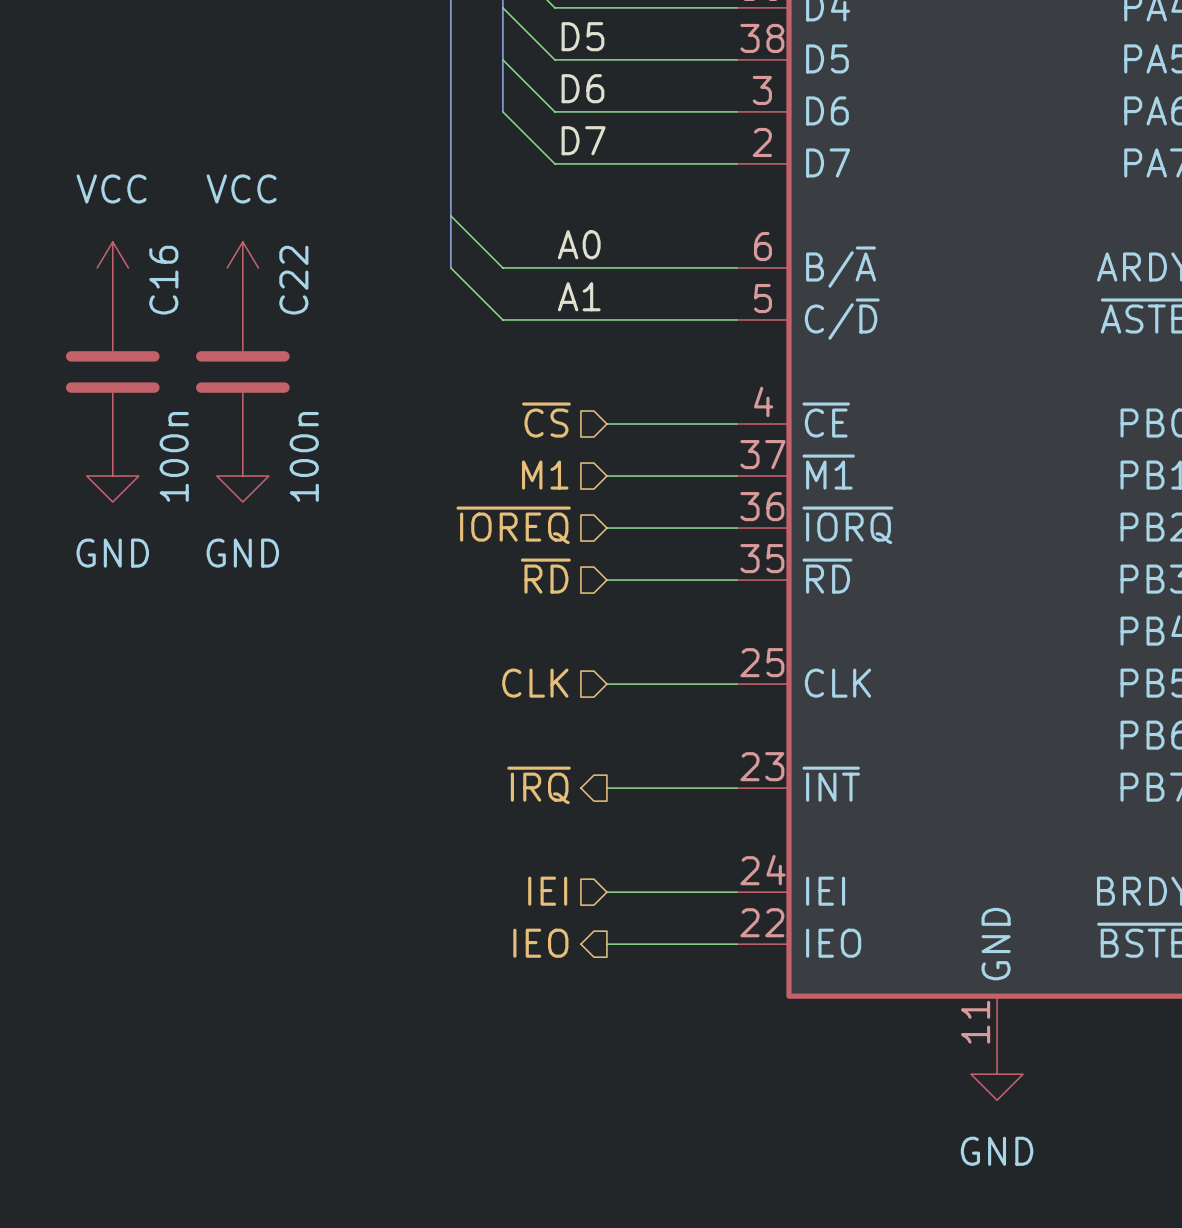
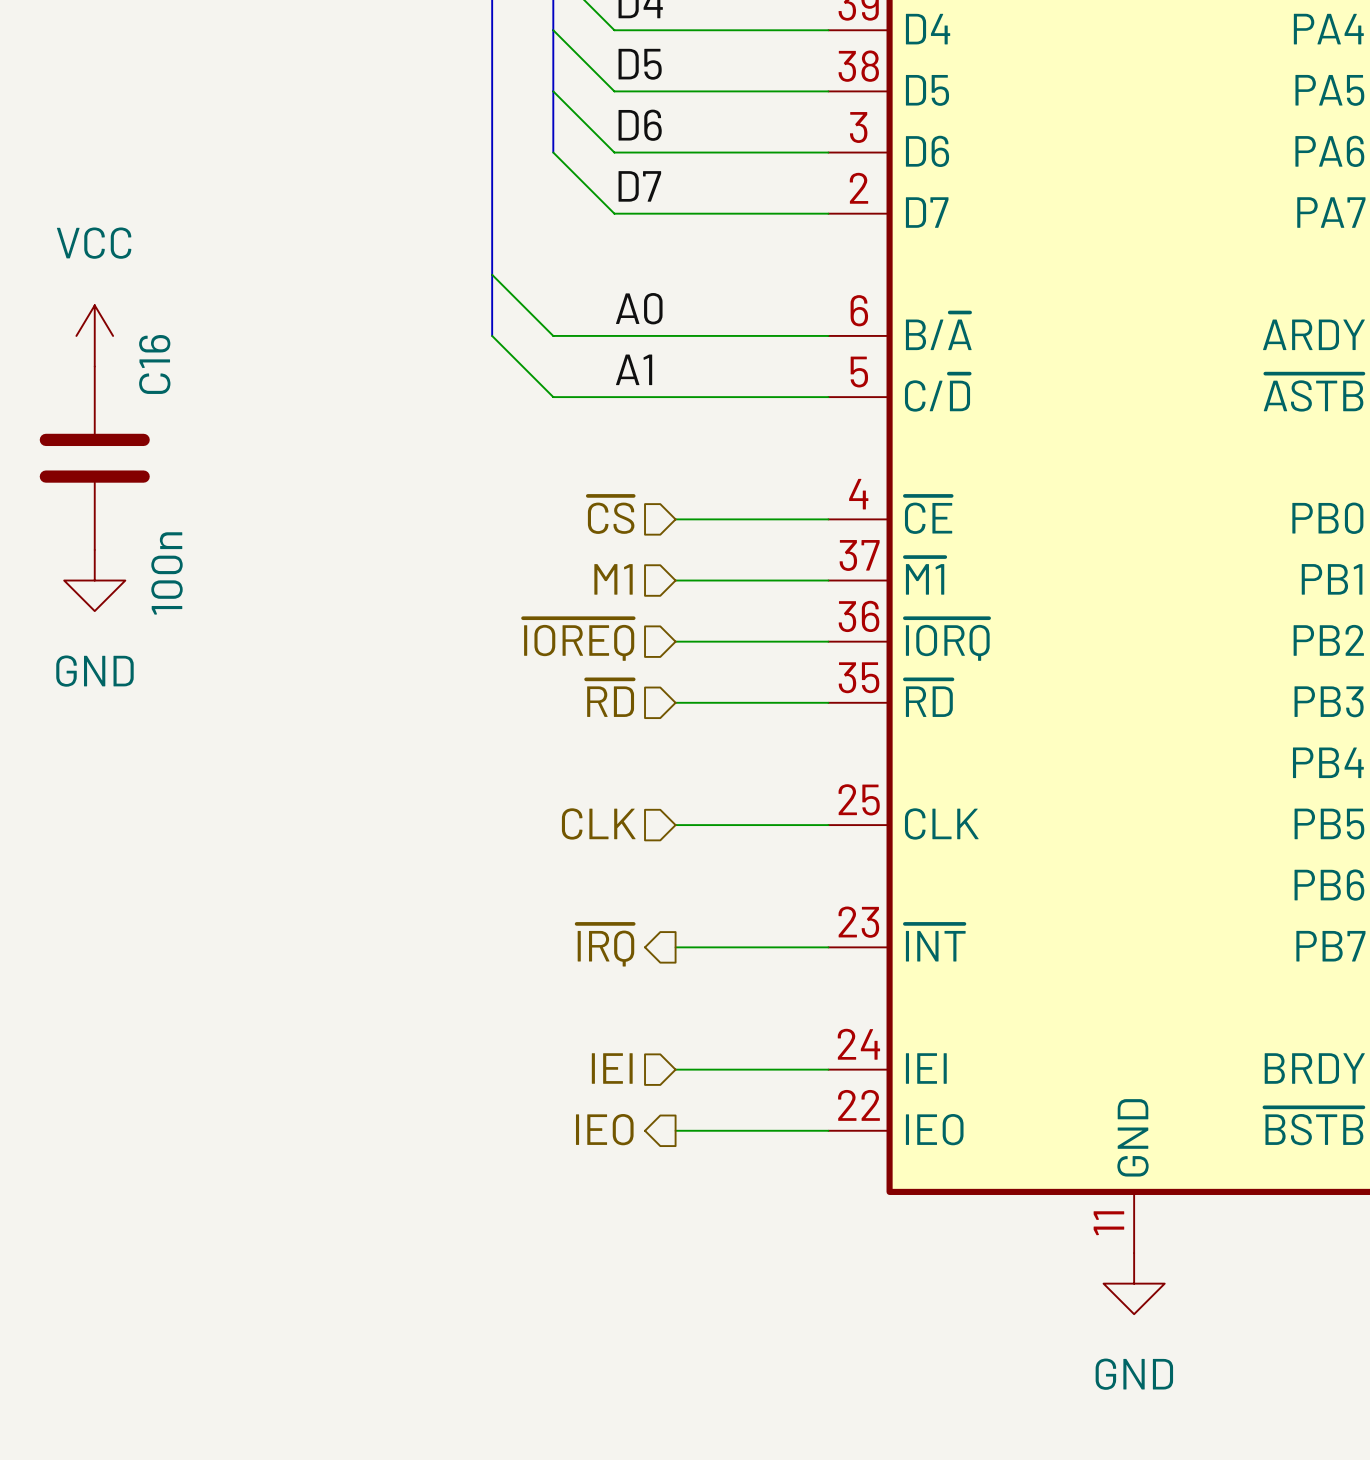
power symbol: VCC (242, 267) -> none
C22: 100n (242, 371) -> none
power symbol: GND (242, 476) -> none

